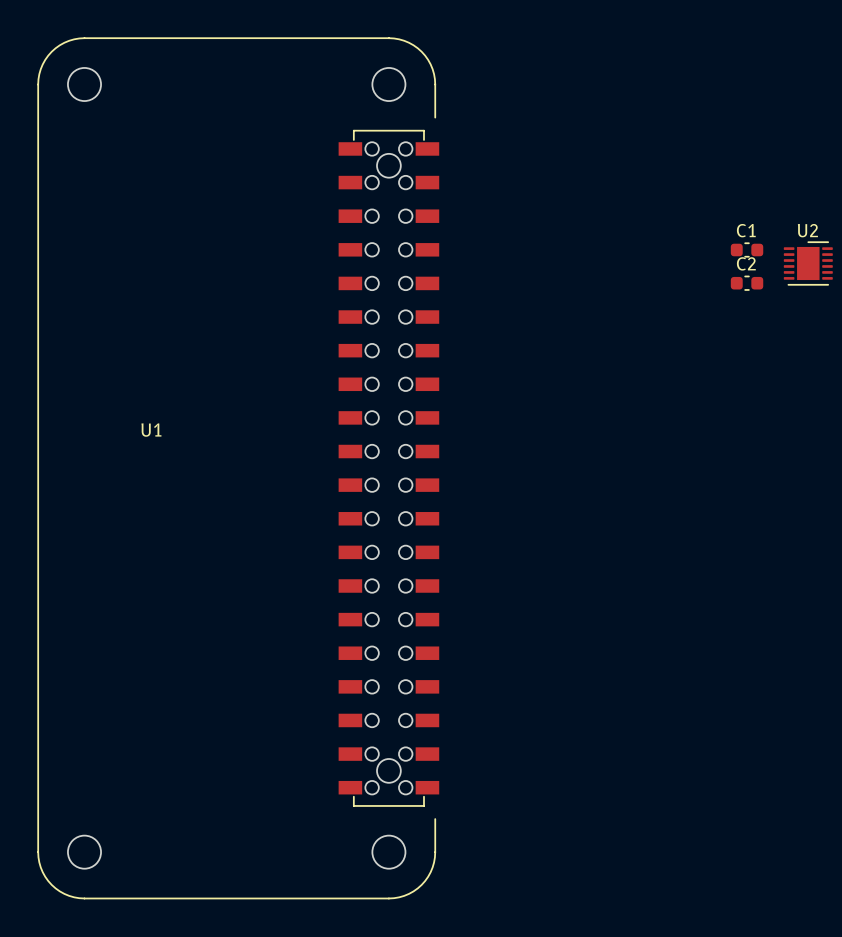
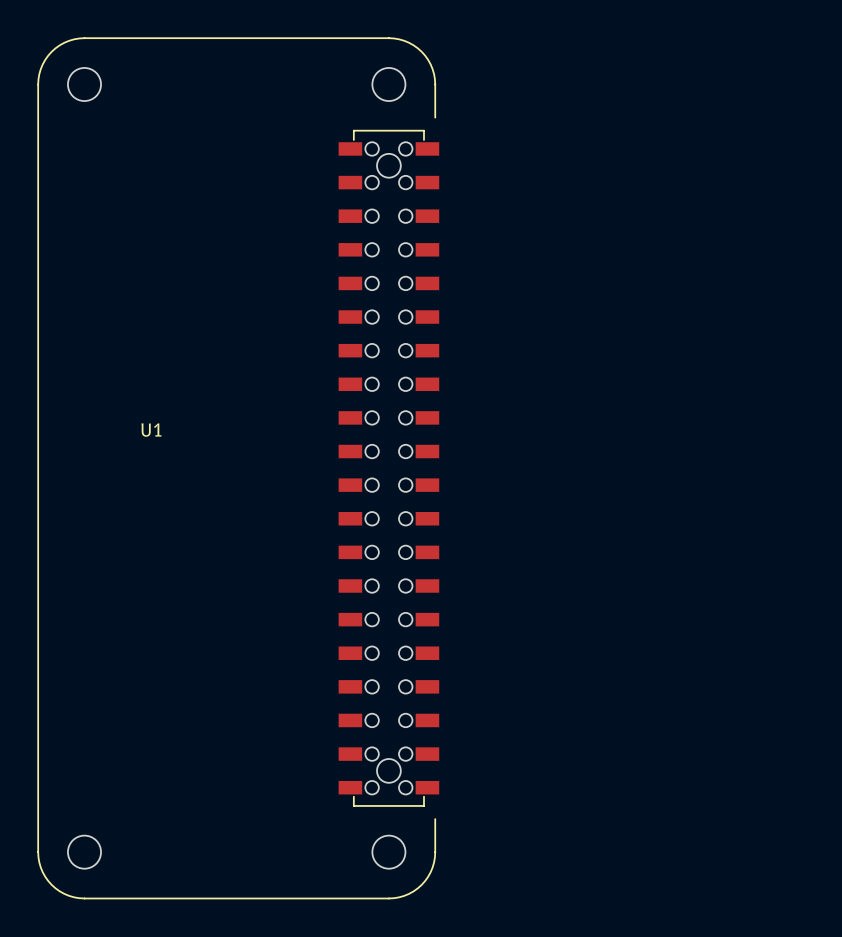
C1: (747, 249) -> none
U2: (808, 263) -> none
C2: (747, 283) -> none

